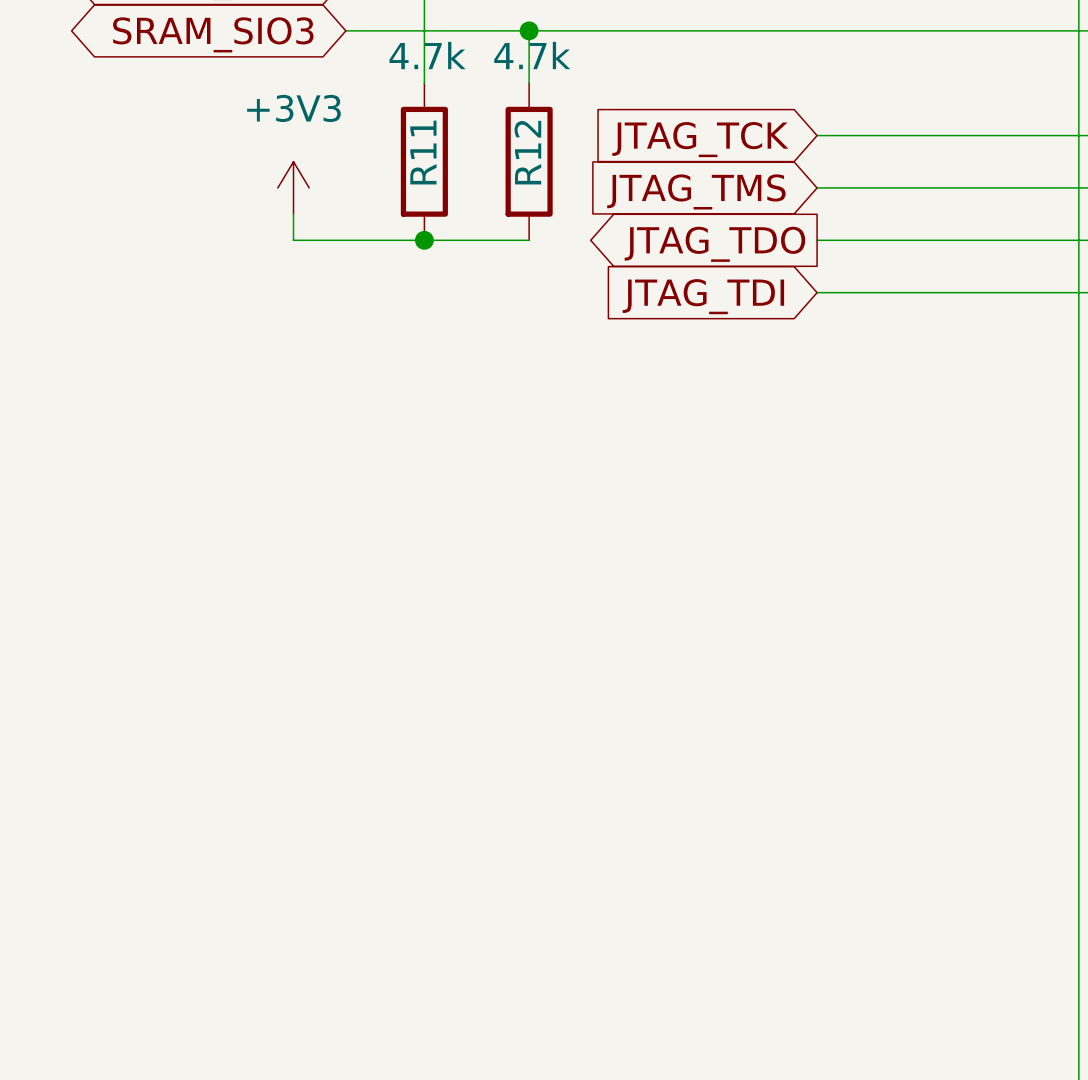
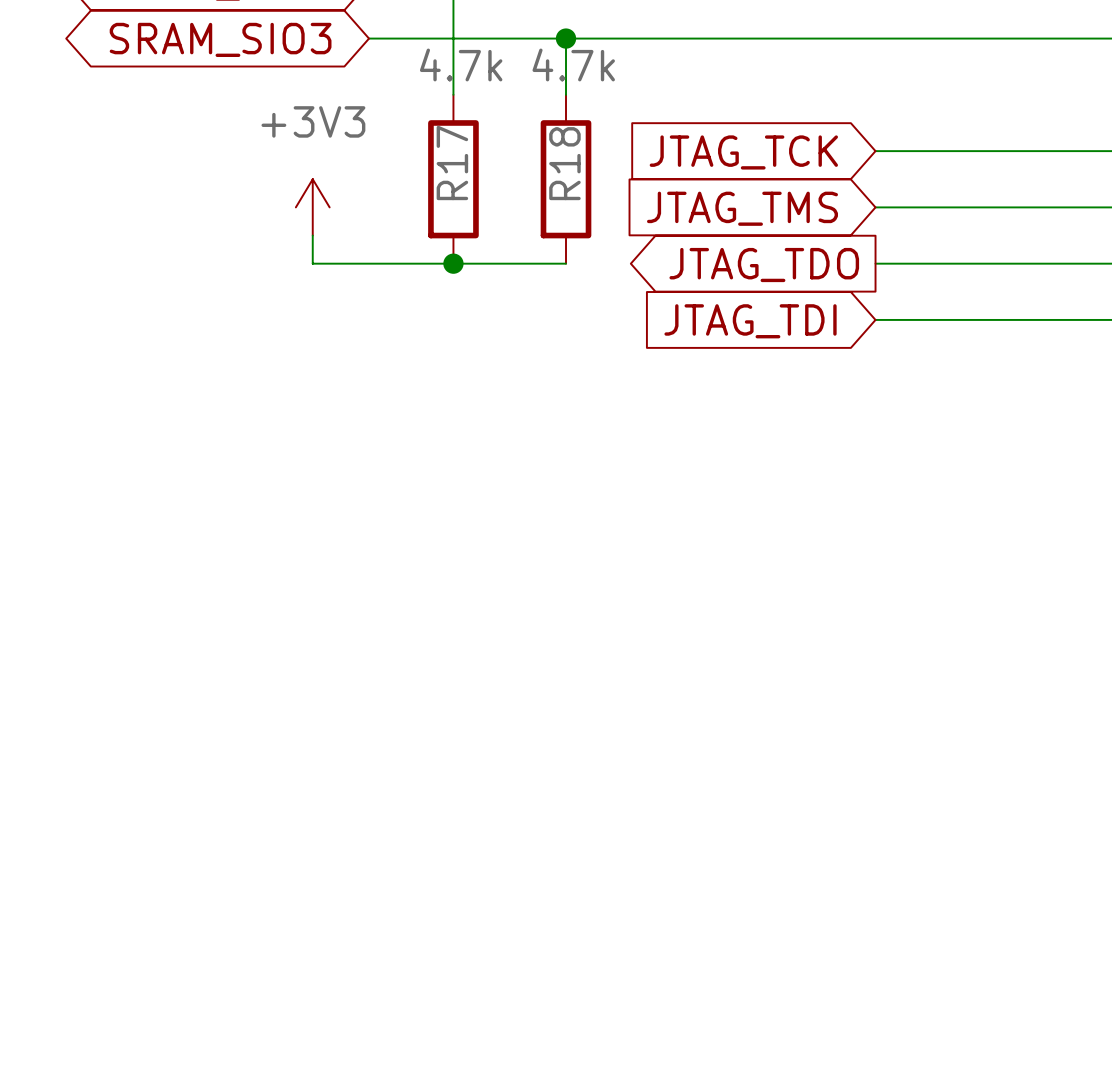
R11 name: R11 (423, 152) -> R17 (452, 162)
R12 name: R12 (527, 152) -> R18 (564, 163)

